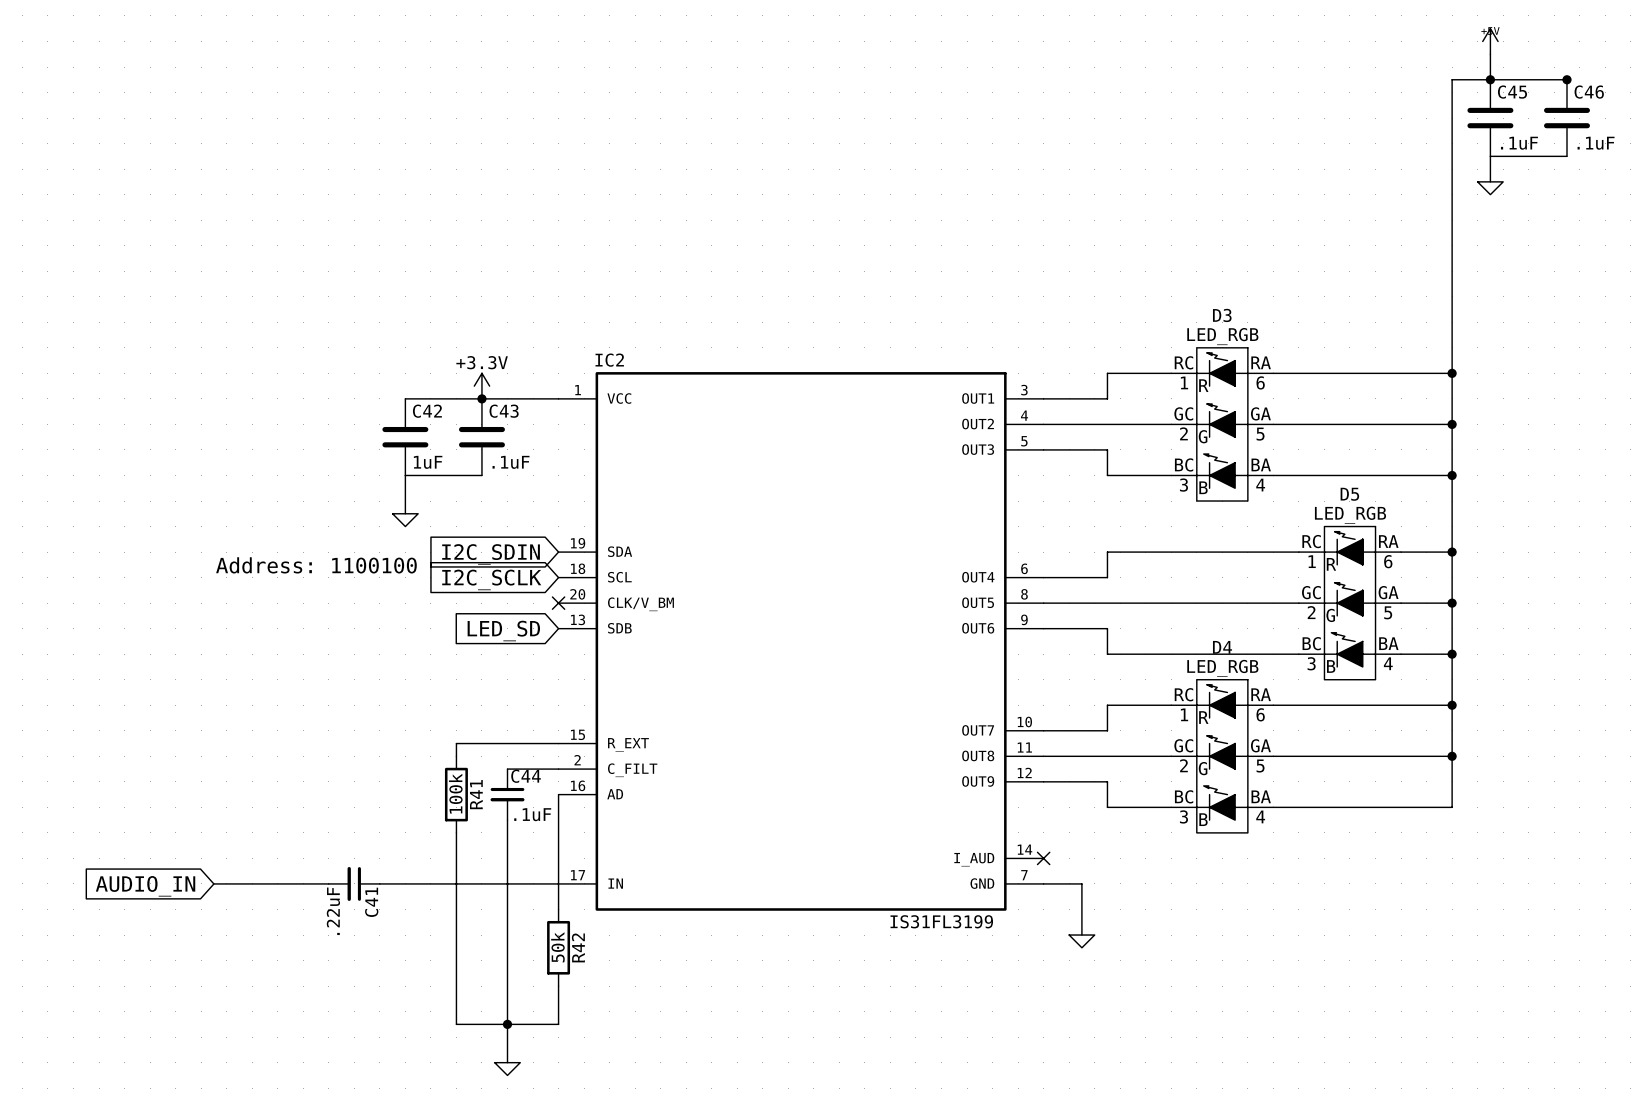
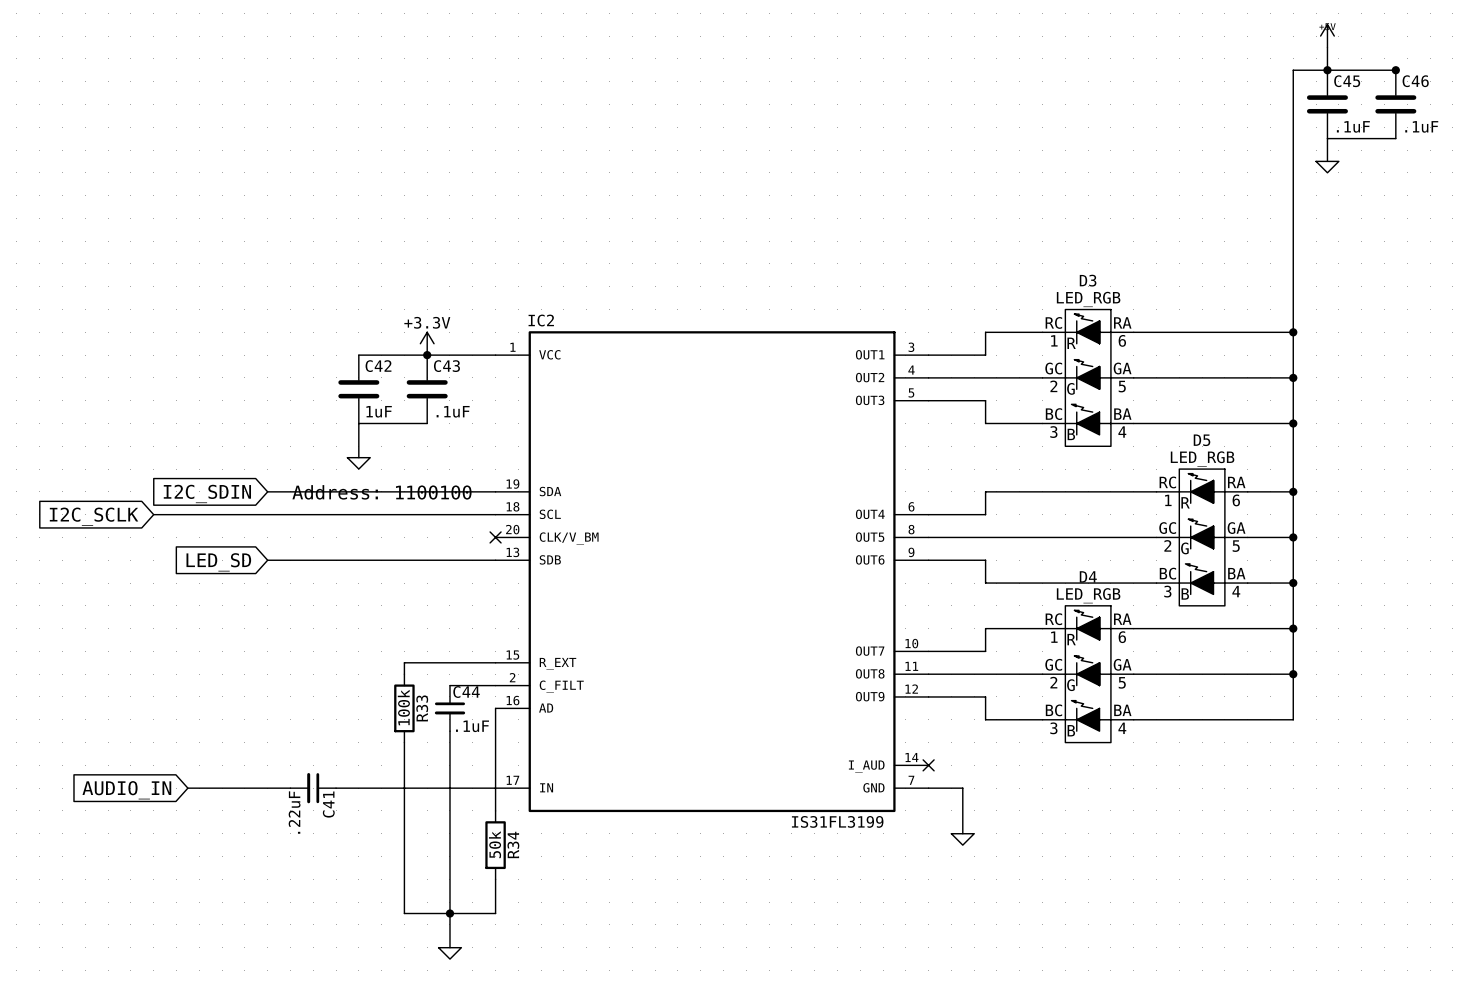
wire: none -> (267, 491) (495, 491)
global label: none -> I2C_SDIN (207, 493)
global label: I2C_SDIN (491, 554) -> none
text position: Address: 1100100 (316, 565) -> Address: 1100100 (382, 492)
wire: none -> (153, 514) (495, 514)
global label: none -> I2C_SCLK (94, 516)
global label: I2C_SCLK (491, 579) -> none
wire: none -> (267, 560) (495, 560)
global label: none -> LED_SD (218, 562)
global label: LED_SD (503, 631) -> none
R41 name: R41 (476, 794) -> R33 (422, 708)
R42 name: R42 (578, 947) -> R34 (513, 844)

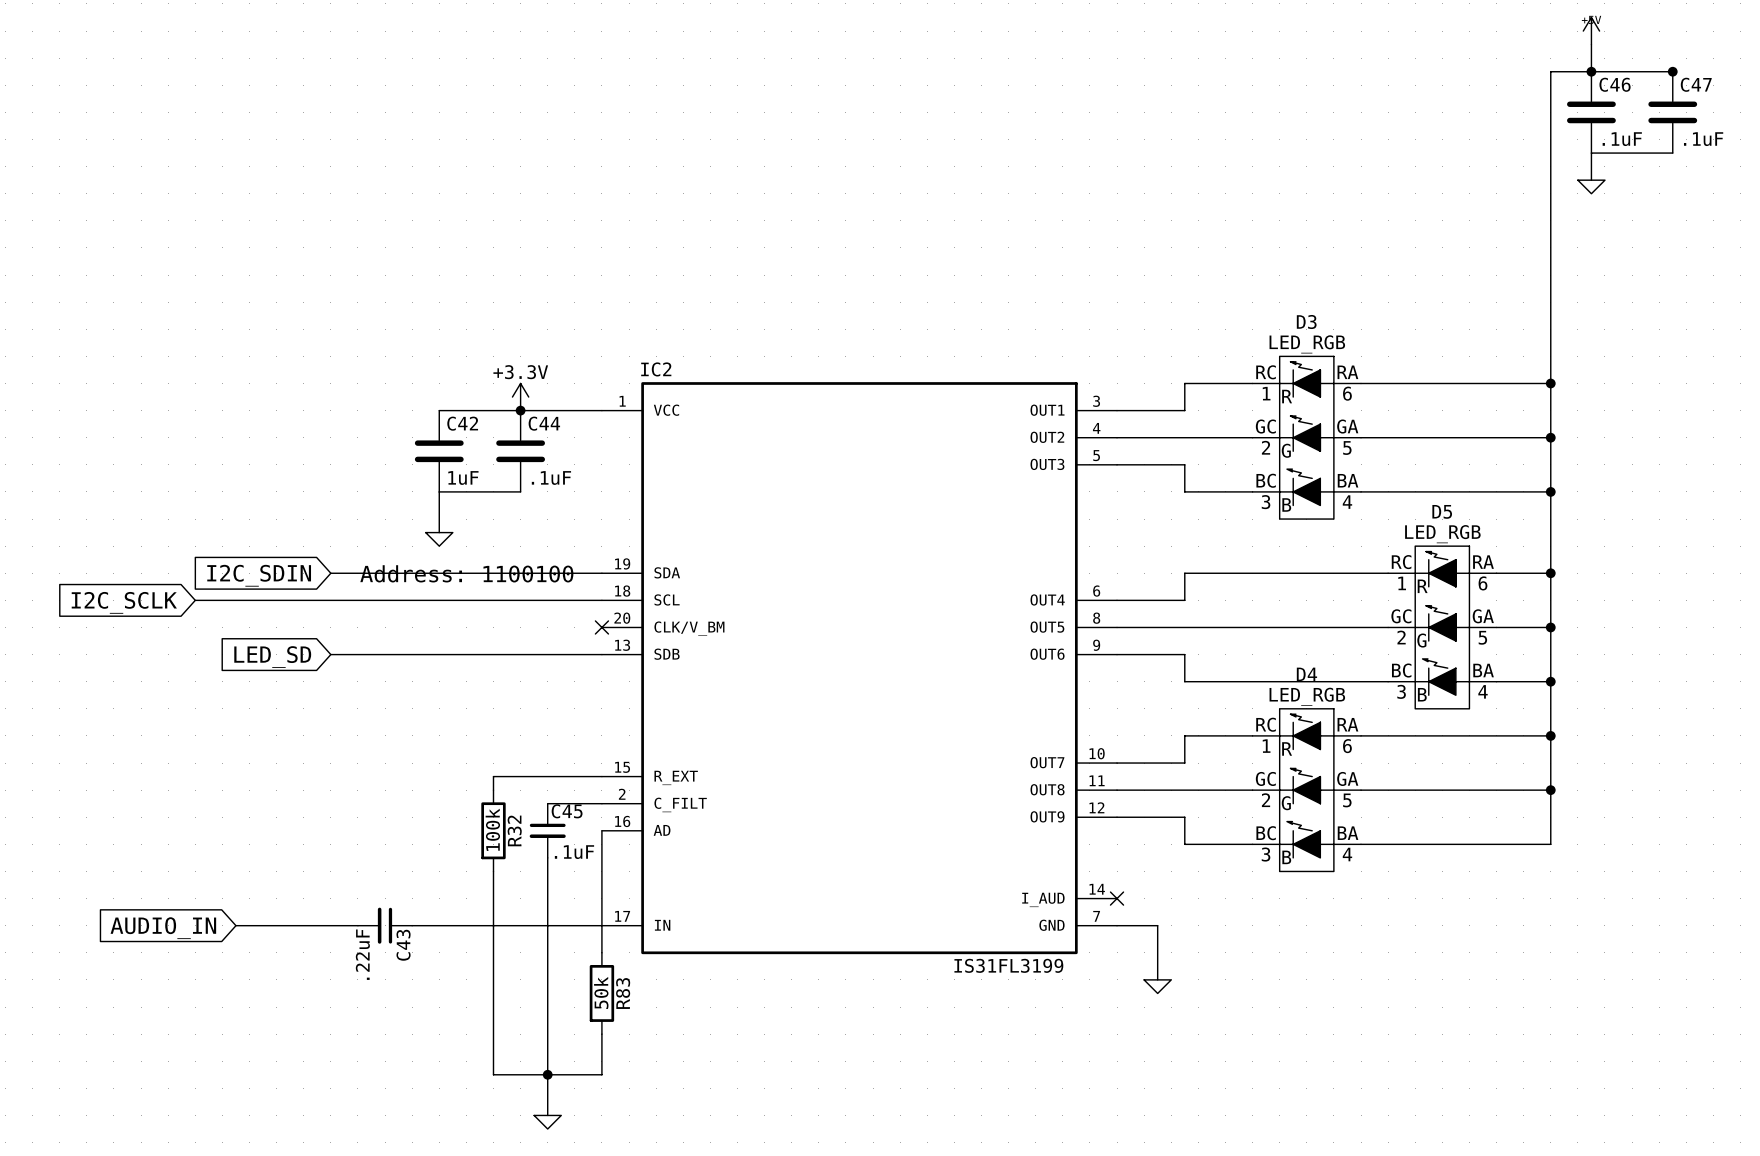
C45 name: C45 (1347, 81) -> C46 (1615, 84)
C46 name: C46 (1415, 81) -> C47 (1696, 84)
C43 name: C43 (446, 366) -> C44 (544, 423)
C44 name: C44 (466, 692) -> C45 (567, 811)
R33 name: R33 (422, 708) -> R32 (514, 830)
C41 name: C41 (328, 804) -> C43 (403, 945)
R34 name: R34 (513, 844) -> R83 (623, 993)

